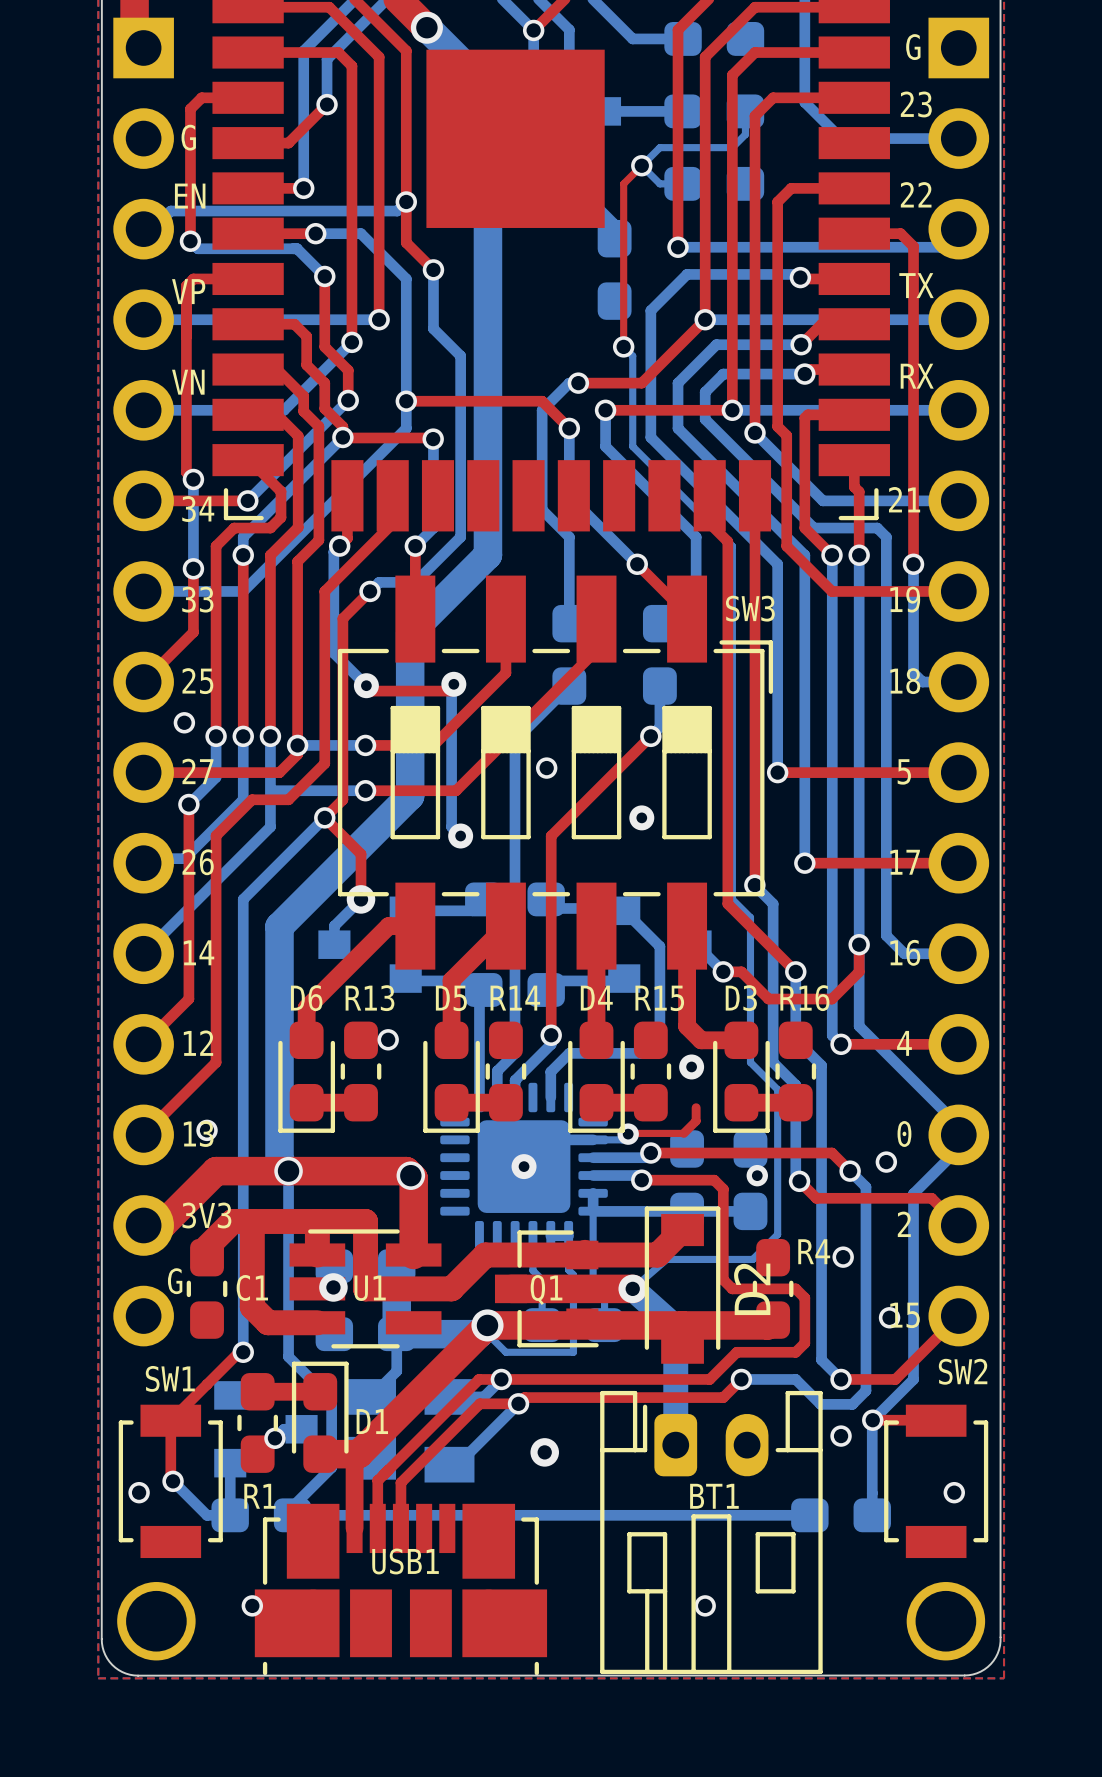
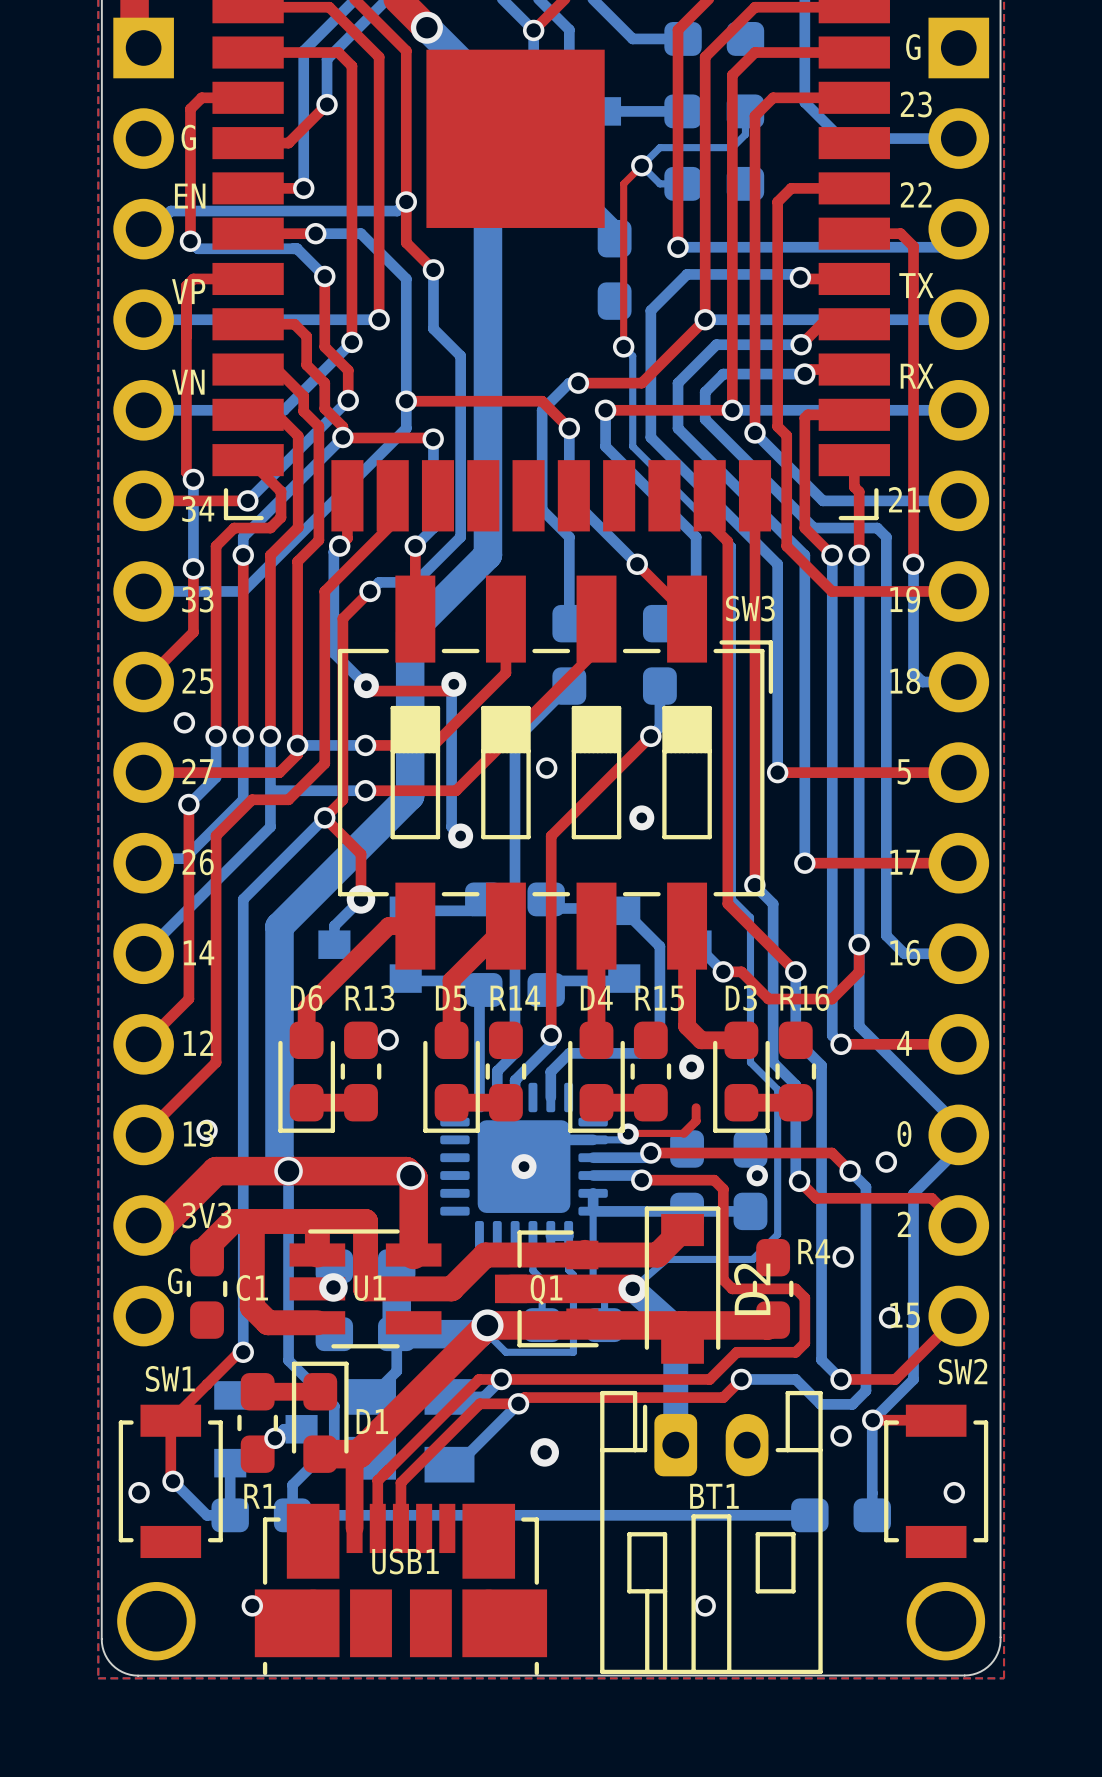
bottom track: (288, 1356) (331, 1399) (331, 1467) (292, 1506) -> (288, 1356) (288, 1360) (334, 1406) (334, 1443) (292, 1485) (292, 1506)

